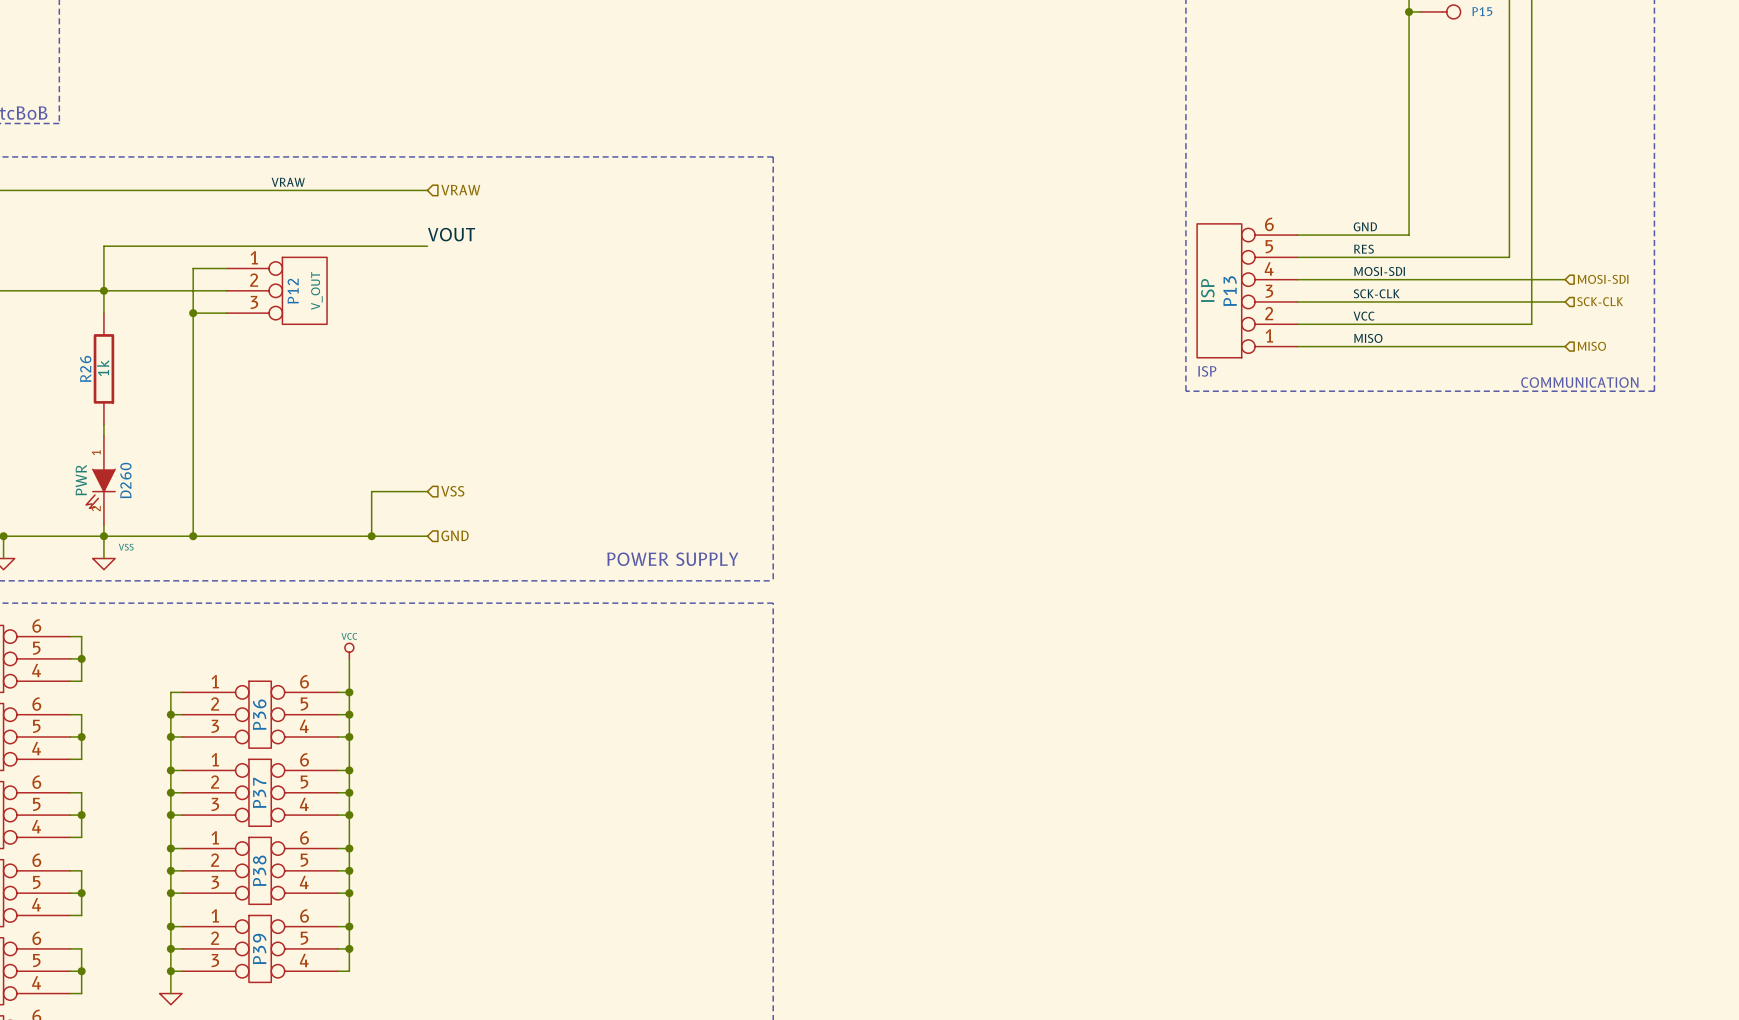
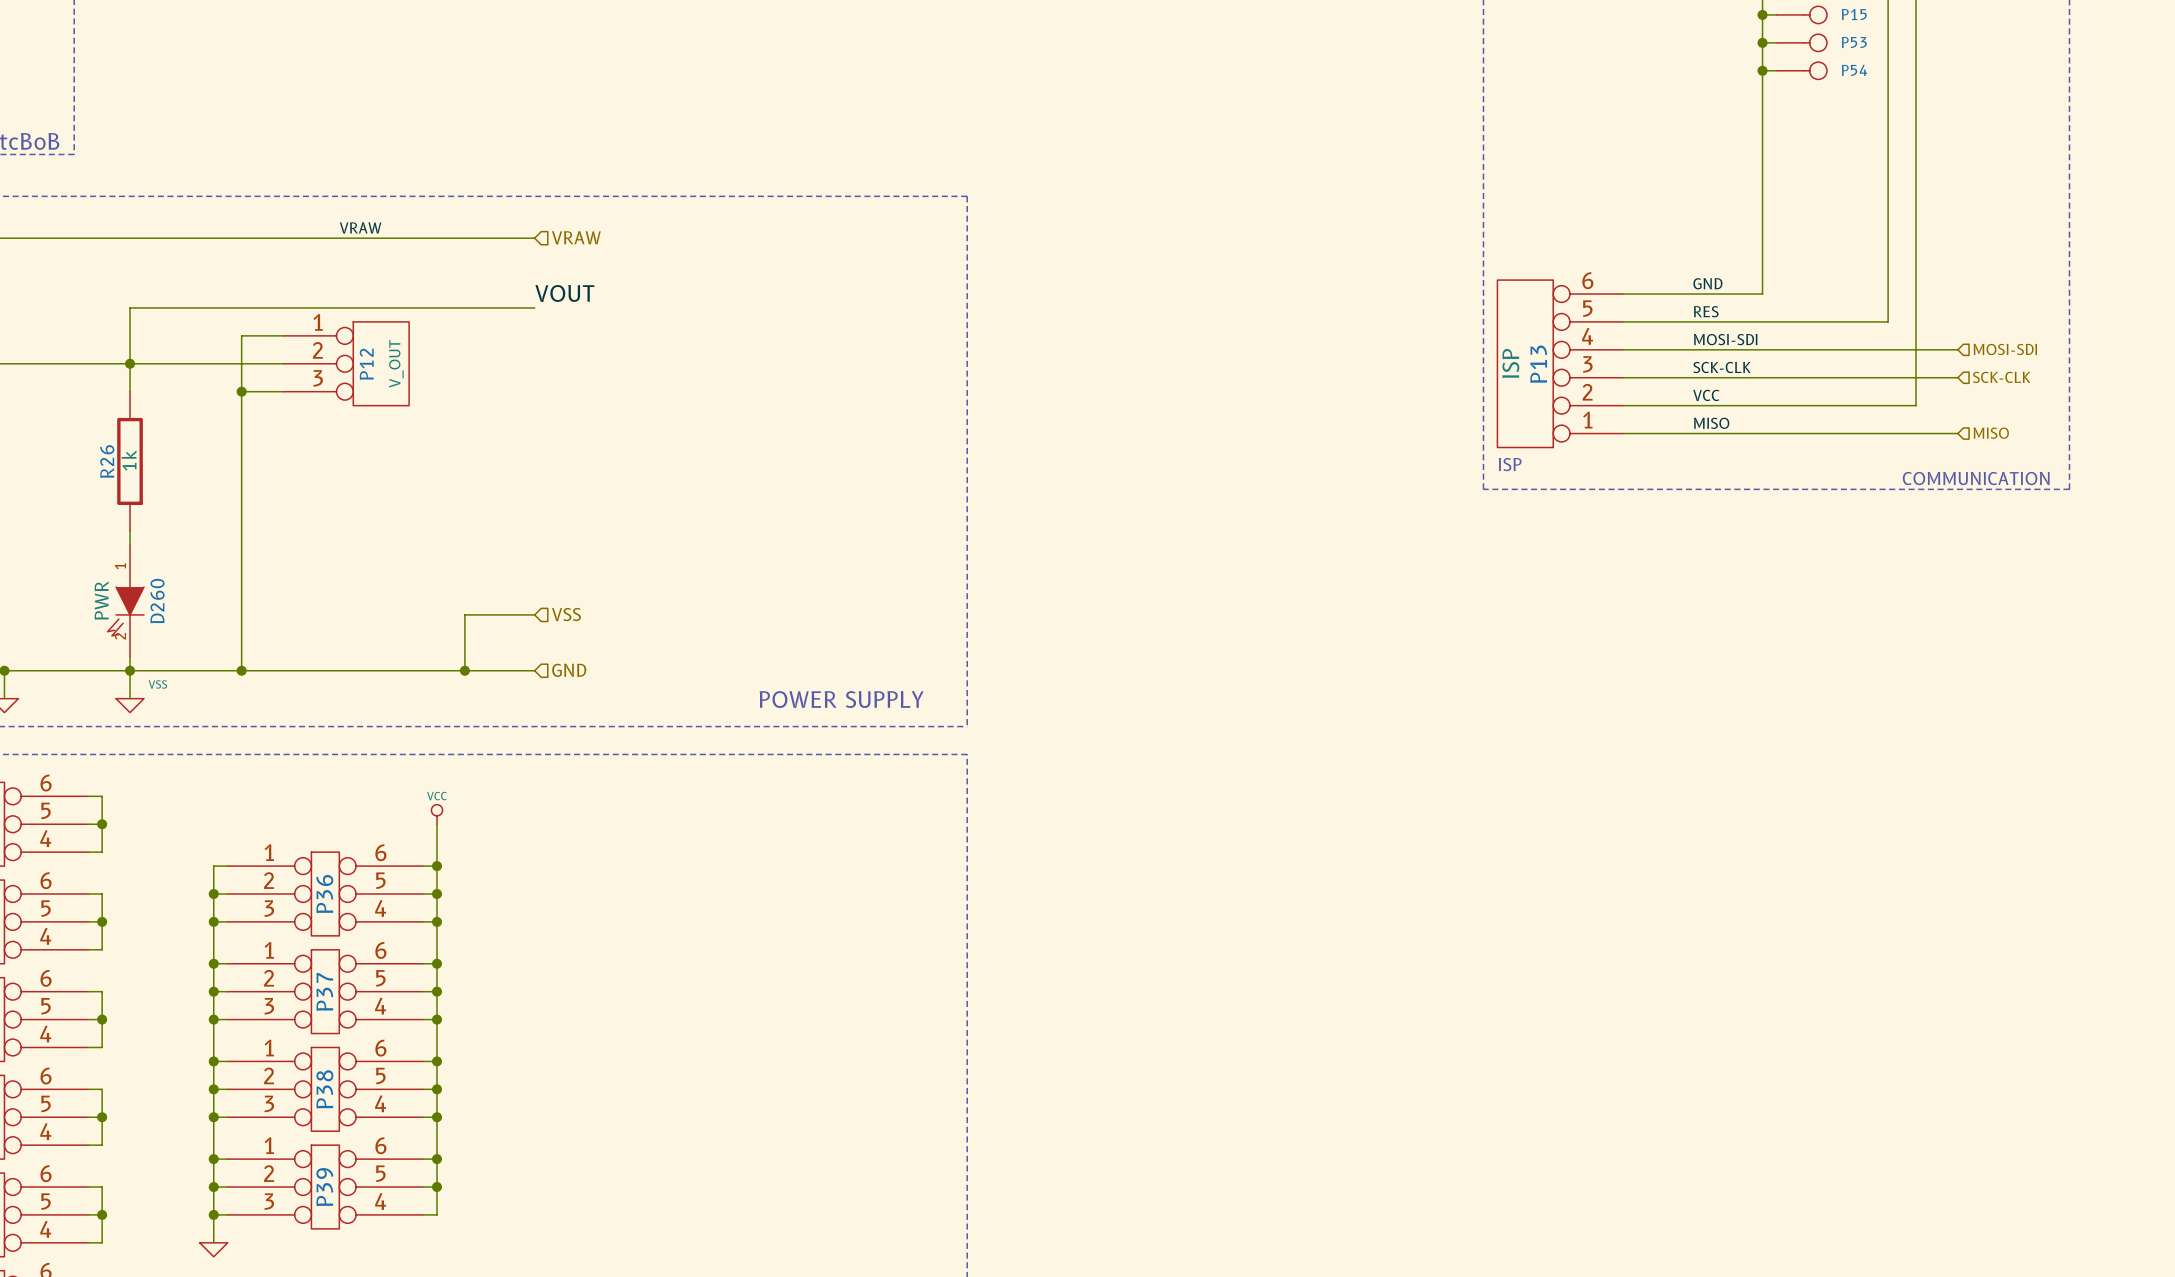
wire: none -> (1762, 42) (1776, 42)
junction: none -> (1762, 42)
P53: none -> (1801, 42)
wire: none -> (1762, 70) (1776, 70)
junction: none -> (1762, 70)
P54: none -> (1801, 70)

